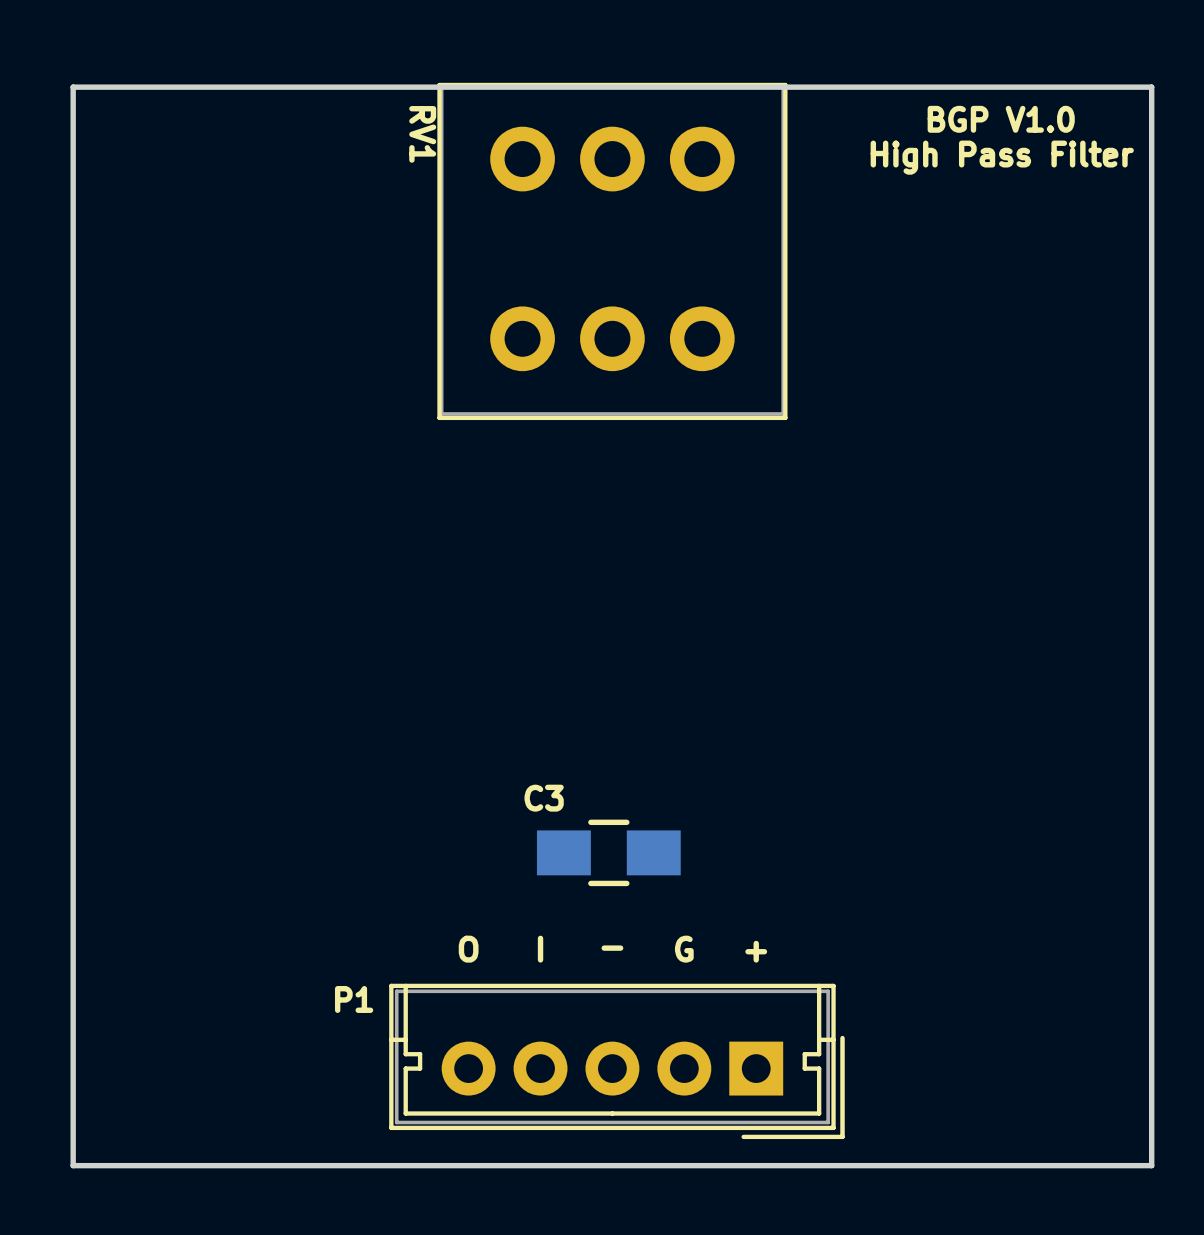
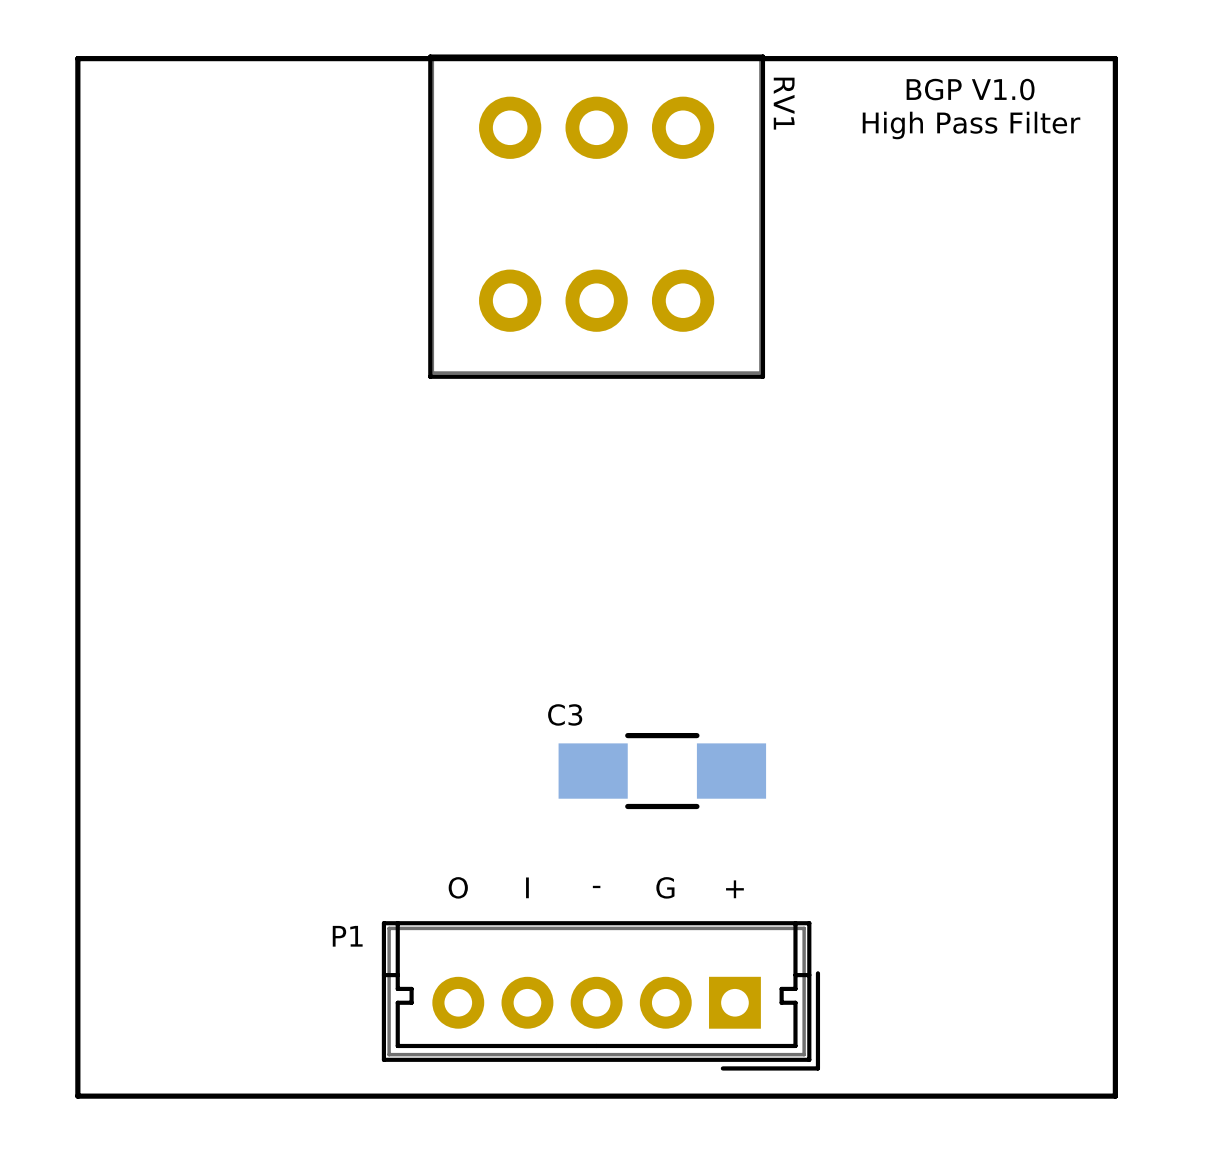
RV1 name position: RV1 (422, 134) -> RV1 (784, 103)
C3 footprint: [536, 819, 681, 887] -> [558, 733, 767, 810]

